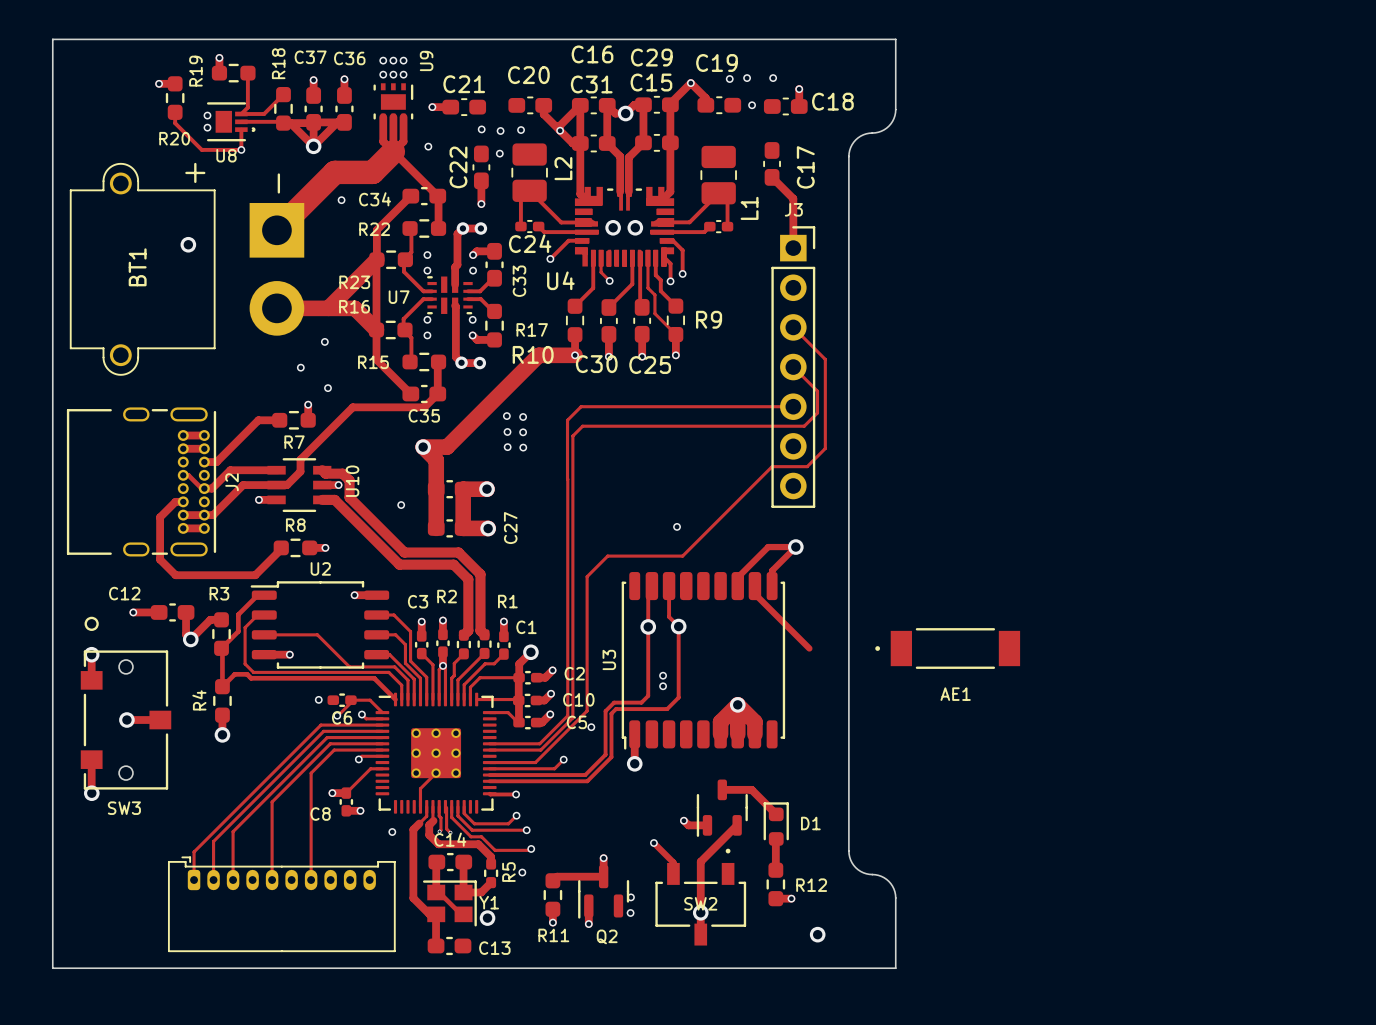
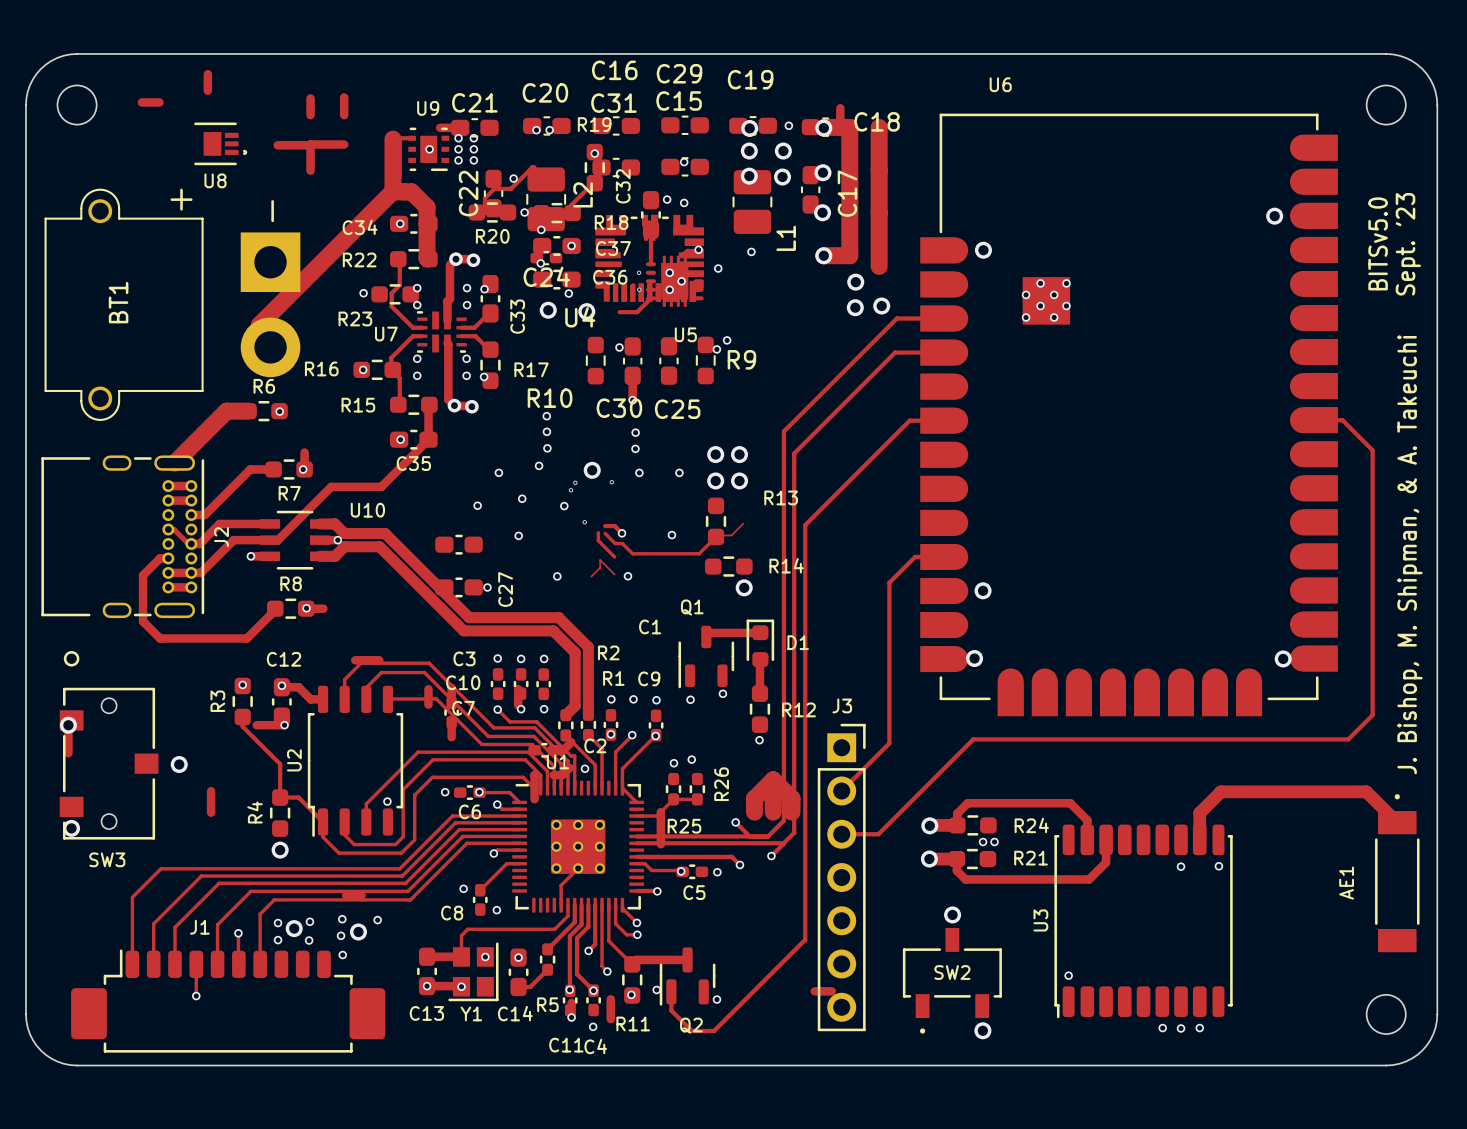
board edge: (99, 39) (52, 39) (52, 86) -> (77, 53) (57, 57) (40, 68) (29, 85) (25, 105)
board edge: (895, 39) (895, 109) (893, 118) (884, 129) (858, 137) (852, 144) (848, 156) (848, 851) (852, 862) (858, 869) (884, 877) (893, 889) (895, 897) (895, 968) (52, 968) (52, 919) -> (945, 53) (1386, 53) (1399, 55) (1417, 64) (1426, 73) (1433, 85) (1437, 105) (1437, 1014) (1433, 1033) (1422, 1050) (1405, 1061) (1386, 1065) (77, 1065) (57, 1061) (40, 1050) (29, 1033) (25, 1014)
via: (219, 57) -> none
via: (383, 60) -> none
via: (393, 60) -> none
via: (403, 60) -> none
U9 name position: U9 (426, 60) -> U9 (428, 108)
round board edge: none -> [56, 84, 98, 126]
round board edge: none -> [1365, 84, 1407, 126]
R19 rotation: 0° (233, 73) -> 90° clockwise (594, 167)
R19 position: (233, 73) -> (594, 167)
track: (247, 73) (247, 107) (241, 114) (264, 114) (283, 94) -> none
via: (383, 74) -> none
via: (393, 74) -> none
via: (403, 74) -> none
via: (747, 78) -> none
via: (773, 78) -> none
via: (344, 79) -> none
via: (729, 79) -> none
via: (313, 80) -> none
via: (159, 83) -> none
via: (690, 83) -> none
via: (799, 89) -> none
R20 rotation: 0° (175, 98) -> 90° clockwise (492, 212)
R20 position: (175, 98) -> (492, 212)
U9 rotation: 0° (393, 101) -> 90° clockwise (428, 149)
U9 position: (393, 101) -> (428, 149)
track: (543, 105) (543, 114) (572, 143) (580, 143) -> none
track: (705, 105) (705, 98) (690, 83) (670, 103) (670, 191) (660, 202) -> none
track: none -> (879, 127) (879, 266)
via: (432, 107) -> none
via: none -> (749, 128)
track: none -> (823, 128) (849, 127) (849, 255) (823, 255)
via: none -> (823, 128)
R18 rotation: 0° (283, 108) -> 90° clockwise (556, 213)
R18 position: (283, 108) -> (556, 213)
C37 rotation: 0° (313, 108) -> 90° clockwise (556, 245)
C37 position: (313, 108) -> (556, 245)
C36 rotation: 0° (344, 108) -> 90° clockwise (556, 279)
C36 position: (344, 108) -> (556, 279)
via: none -> (536, 130)
via: none -> (549, 130)
track: (175, 112) (175, 123) (201, 149) (241, 149) (241, 129) -> none
via: (625, 113) -> none
via: (207, 115) -> none
track: none -> (412, 138) (392, 139) (392, 191)
via: none -> (458, 138)
via: none -> (473, 138)
track: (383, 117) (383, 141) (438, 196) (438, 228) -> none
track: (403, 117) (403, 141) (372, 172) (334, 172) (276, 230) -> none
track: (241, 121) (283, 121) -> none
track: (337, 122) (313, 146) (290, 123) -> none
via: none -> (429, 149)
via: none -> (458, 149)
via: none -> (473, 149)
via: (207, 127) -> none
via: none -> (749, 151)
via: none -> (783, 151)
via: (481, 129) -> none
via: (500, 130) -> none
via: (521, 130) -> none
track: (560, 130) (560, 125) (580, 105) (580, 194) (588, 202) -> none
via position: (560, 130) -> (594, 153)
via: none -> (458, 160)
via: none -> (473, 160)
via: none -> (684, 162)
track: none -> (534, 167) (510, 188) (494, 188) (484, 198) (484, 213)
via: (313, 146) -> none
via: (428, 146) -> none
via: none -> (822, 172)
via: (241, 149) -> none
via: none -> (749, 176)
via: none -> (782, 176)
track: none -> (594, 181) (571, 205) (571, 213)
via: none -> (667, 199)
via: none -> (684, 202)
track: (772, 177) (793, 198) (793, 248) -> none
track: (481, 180) (481, 204) -> none
via: none -> (524, 212)
via: none -> (822, 212)
C32: none -> (650, 214)
via: none -> (1274, 216)
track: (620, 191) (620, 156) (607, 143) (607, 105) (615, 113) (625, 113) (634, 104) (643, 104) (643, 142) (628, 157) (628, 191) -> none
via: none -> (400, 223)
track: (410, 196) (376, 230) (376, 259) -> none
C34 position: (424, 196) -> (413, 223)
via: (341, 200) -> none
via: none -> (541, 229)
track: none -> (650, 229) (650, 264)
via: (481, 204) -> none
text: none -> BITSv5.0 (1378, 243)
text: none -> Sept. '23 (1408, 244)
via: none -> (571, 245)
via: none -> (698, 249)
via: none -> (983, 250)
via: none -> (751, 251)
track: (583, 222) (561, 222) (529, 190) (520, 199) (520, 226) -> none
track: (666, 222) (689, 222) (718, 193) (727, 202) (727, 226) -> none
via: none -> (823, 255)
track: (538, 226) (544, 232) (586, 232) -> none
track: (709, 226) (704, 232) (662, 232) -> none
part: (718, 226) -> none
track: none -> (427, 259) (427, 207) (411, 191) (392, 191) (259, 324) (259, 327)
via: (613, 227) -> none
via: (635, 227) -> none
track: (411, 228) (411, 252) (404, 259) (404, 271) (423, 291) (432, 291) -> (399, 259) (399, 285) (391, 293) (391, 306) (412, 327) (422, 327)
R22 position: (424, 228) -> (413, 259)
track: (480, 228) (462, 228) (457, 233) (455, 284) -> (475, 259) (455, 259) (450, 265) (450, 298) (447, 301) (447, 320)
via position: (480, 228) -> (455, 259)
via: none -> (540, 263)
via: none -> (718, 268)
via: none -> (639, 272)
via: none -> (669, 272)
track: (582, 240) (568, 240) (550, 259) -> none
track: (667, 240) (673, 240) (682, 250) (682, 273) -> none
via: (188, 244) -> none
U5: none -> (674, 281)
via: none -> (681, 281)
via: none -> (855, 282)
via: none -> (1040, 283)
via: none -> (1066, 283)
track: (494, 251) (476, 251) (473, 255) -> none
via: none -> (417, 288)
via: none -> (467, 288)
via: (427, 255) -> none
via: none -> (639, 289)
via: none -> (669, 289)
track: (663, 257) (670, 263) (670, 281) -> none
via: none -> (363, 293)
track: (593, 258) (593, 288) (575, 306) -> none
track: (601, 258) (601, 272) (609, 280) -> none
track: (632, 258) (632, 284) (608, 307) -> none
track: (647, 258) (647, 288) (654, 295) (654, 313) (675, 334) (675, 355) -> none
track: (655, 258) (655, 275) (660, 280) (660, 291) (675, 306) -> none
track: (376, 259) (328, 308) (276, 308) (354, 308) (376, 329) -> none
track: (376, 259) (376, 359) (410, 393) -> none
track: (640, 259) (640, 305) (642, 307) -> none
via: none -> (1026, 294)
via: none -> (1054, 294)
track: none -> (650, 298) (637, 312) (619, 312)
C33 position: (494, 264) -> (490, 298)
via: none -> (417, 305)
via: none -> (467, 305)
via: (427, 270) -> none
via: (473, 270) -> none
via: none -> (881, 305)
via: none -> (1040, 305)
via: none -> (1066, 305)
via: none -> (855, 307)
via: (682, 273) -> none
via: none -> (548, 310)
via: none -> (586, 311)
track: (494, 276) (480, 291) (468, 291) -> (490, 311) (474, 327) (461, 327)
via: (609, 280) -> none
via: none -> (1026, 317)
via: none -> (1054, 317)
via: (670, 281) -> none
track: none -> (937, 318) (896, 318) (783, 431) (783, 820) (768, 836) (636, 836)
U7 position: (449, 295) -> (441, 331)
track: (432, 299) (423, 299) (403, 319) (403, 329) (411, 337) (411, 361) -> (422, 336) (412, 336) (391, 357) (391, 369) (399, 378) (399, 404)
track: (468, 299) (480, 299) (494, 312) -> (461, 336) (475, 336) (490, 351)
via: none -> (727, 340)
track: (455, 305) (455, 357) (461, 363) (479, 363) -> (447, 343) (448, 399) (454, 405) (474, 405)
R16 name position: R16 (354, 306) -> R16 (321, 368)
via: none -> (619, 347)
via: none -> (716, 349)
track: none -> (937, 352) (895, 352) (794, 453) (794, 832) (783, 843)
via: none -> (417, 358)
via: none -> (466, 358)
via: (427, 319) -> none
via: (472, 319) -> none
R17 position: (494, 325) -> (490, 365)
track: (793, 327) (825, 359) (825, 448) (807, 466) (772, 466) (682, 556) (607, 556) (587, 576) (587, 710) (535, 762) (489, 762) -> none
via: none -> (363, 369)
R16 position: (390, 329) -> (377, 369)
via: none -> (417, 375)
via: none -> (466, 375)
track: (575, 334) (575, 355) (538, 355) (447, 447) (423, 447) (436, 460) (436, 528) -> none
track: (642, 334) (642, 356) -> none
via: (427, 335) -> none
track: (472, 335) (477, 339) (494, 339) -> none
via: (324, 341) -> none
via: (575, 355) -> none
via: (675, 355) -> none
via: (642, 356) -> none
R15 position: (424, 361) -> (413, 404)
track: (438, 361) (437, 393) (424, 407) (352, 407) (300, 459) (300, 471) (287, 485) (283, 485) -> (429, 404) (428, 439) (381, 486) (331, 486) (278, 540)
via position: (479, 363) -> (454, 405)
track: none -> (248, 411) (226, 411) (174, 463)
R6: none -> (263, 411)
via position: (300, 367) -> (279, 411)
track: (793, 367) (817, 391) (817, 412) (804, 426) (582, 426) (572, 436) (572, 717) (540, 750) (489, 750) -> none
J3 position: (793, 367) -> (841, 877)
U6: none -> (1129, 414)
via: none -> (546, 416)
track: none -> (937, 420) (909, 420) (805, 525) (805, 939) (713, 1031) (691, 1031) (671, 1010) (671, 991)
track: none -> (1320, 420) (1342, 420) (1372, 450) (1372, 715) (1348, 739) (973, 739) (878, 834) (841, 834)
via: none -> (546, 431)
via: none -> (635, 432)
via: (327, 388) -> none
via: none -> (400, 439)
C35 position: (424, 393) -> (413, 439)
via: none -> (547, 448)
via: none -> (635, 448)
via position: (308, 404) -> (303, 469)
via: none -> (715, 454)
via: none -> (739, 454)
track: (793, 406) (581, 406) (567, 420) (567, 715) (539, 743) (489, 743) -> none
via: (506, 416) -> none
via: none -> (592, 470)
via: none -> (498, 472)
via: none -> (639, 472)
via: none -> (679, 472)
via: none -> (715, 480)
via: none -> (739, 480)
via: (507, 431) -> none
via: none -> (611, 482)
via: (523, 432) -> none
via: none -> (575, 482)
via: none -> (570, 490)
via: (423, 447) -> none
via: (523, 447) -> none
via: none -> (477, 505)
via: none -> (564, 506)
R13: none -> (716, 521)
via: none -> (584, 522)
track: none -> (743, 523) (731, 535) (716, 535)
track: (322, 470) (325, 473) (342, 473) (349, 480) (349, 497) (404, 552) (458, 552) (480, 574) (480, 630) (484, 634) -> (319, 523) (334, 523) (344, 533) (385, 533) (469, 617) (558, 617) (588, 647) (588, 714)
track: none -> (605, 526) (614, 526) (622, 533)
track: none -> (598, 532) (598, 540) (614, 557)
track: none -> (605, 533) (615, 543) (622, 543) (632, 553) (699, 553) (716, 536)
via: none -> (622, 533)
via: none -> (671, 535)
U10 name rotation: 0° (352, 481) -> 90° clockwise (367, 510)
via: none -> (518, 535)
track: (486, 489) (463, 489) (463, 528) (487, 528) -> none
via: (486, 489) -> none
text: none -> J. Bishop, M. Shipman, & A. Takeuchi (1409, 554)
track: (334, 499) (399, 564) (453, 564) (468, 579) (468, 630) (463, 635) -> (333, 556) (344, 546) (379, 546) (463, 630) (553, 630) (575, 652) (575, 705) (565, 715)
track: none -> (937, 556) (915, 556) (889, 582) (889, 743) (841, 791)
via: (401, 505) -> none
R14: none -> (728, 566)
track: none -> (614, 574) (600, 560) (600, 567) (591, 576)
via: none -> (557, 576)
via: none -> (627, 576)
via: (677, 526) -> none
via: none -> (487, 587)
via: (488, 528) -> none
C27 name position: C27 (510, 528) -> C27 (505, 589)
via: none -> (744, 587)
via: none -> (983, 590)
via position: (325, 547) -> (306, 608)
via: (795, 547) -> none
track: none -> (760, 632) (710, 632) (706, 636)
track: (651, 586) (648, 589) (648, 695) (641, 702) (614, 702) (605, 711) (605, 754) (585, 775) (489, 775) -> none
track: (669, 586) (669, 616) (678, 626) (678, 697) (667, 709) (616, 709) (611, 713) (611, 757) (587, 781) (489, 781) -> none
track: (737, 586) (737, 577) (768, 547) (795, 547) (772, 570) (772, 586) -> none
track: (754, 586) (754, 594) (809, 648) -> none
Q1: none -> (706, 656)
R3 name rotation: 0° (219, 593) -> 90° counterclockwise (217, 701)
R3 name position: R3 (219, 593) -> R3 (217, 701)
via: none -> (497, 658)
via: none -> (521, 658)
via: none -> (544, 658)
via: none -> (974, 658)
via: none -> (1283, 658)
track: (264, 595) (257, 595) (238, 614) (238, 631) (221, 648) (222, 686) (234, 674) (247, 674) (251, 678) (374, 678) (395, 699) -> none
via: (354, 595) -> none
R2 name position: R2 (447, 596) -> R2 (608, 652)
C3 name position: C3 (418, 601) -> C3 (464, 658)
track: (133, 612) (159, 612) -> none
via: (133, 612) -> none
C12 rotation: 0° (172, 612) -> 90° clockwise (281, 701)
C12 position: (172, 612) -> (281, 701)
track: (186, 612) (186, 634) (190, 639) (210, 619) (221, 619) -> none
track: (264, 615) (257, 615) (245, 627) (245, 663) (253, 672) (388, 672) (401, 685) (401, 699) -> none
track: (376, 615) (393, 615) (410, 631) (410, 661) (426, 677) (426, 699) -> none
via: none -> (242, 684)
C7: none -> (543, 684)
via: none -> (281, 685)
track: none -> (281, 687) (298, 687) (310, 699) (323, 699)
via: (442, 620) -> none
via: (421, 621) -> none
via: (503, 621) -> none
U2 rotation: 0° (319, 624) -> 90° counterclockwise (355, 761)
via: none -> (722, 693)
via: (648, 626) -> none
via: (678, 626) -> none
C1 name position: C1 (526, 627) -> C1 (650, 626)
track: none -> (344, 699) (344, 679) (361, 663) (429, 663) (493, 727) (534, 727) (567, 761) (567, 788)
track: none -> (366, 699) (366, 687) (381, 672) (424, 672) (488, 736) (533, 736) (561, 763) (561, 788)
track: none -> (387, 699) (436, 698) (481, 744) (532, 744) (554, 766) (554, 788)
via: none -> (611, 699)
via: none -> (633, 699)
via: none -> (656, 700)
via: none -> (690, 699)
R3 position: (221, 634) -> (242, 701)
track: (264, 634) (317, 634) (349, 666) (394, 666) (407, 680) (407, 699) -> none
track: (376, 634) (395, 634) (405, 644) (405, 663) (420, 678) (420, 699) -> none
via: (190, 639) -> none
track: none -> (497, 709) (509, 721) (536, 721) (570, 756) (574, 756) (574, 788)
via: none -> (497, 709)
via: none -> (521, 709)
via: none -> (544, 709)
C3 position: (421, 644) -> (498, 684)
R2 position: (463, 644) -> (565, 725)
R1 position: (484, 644) -> (588, 724)
C1 position: (503, 645) -> (610, 724)
track: none -> (242, 717) (242, 726) (280, 764) (280, 797) (298, 797) (323, 821) (323, 837) (338, 853) (401, 853) (414, 839) (414, 795) (432, 777) (523, 777) (533, 788)
AE1 rotation: 0° (947, 648) -> 90° clockwise (1397, 873)
AE1 position: (947, 648) -> (1397, 873)
track: (530, 652) (519, 663) (518, 700) (476, 699) -> none
via: (530, 652) -> none
track: (421, 653) (432, 664) (432, 699) -> none
track: (463, 653) (454, 663) (454, 675) (451, 678) (451, 699) -> none
track: (484, 653) (457, 680) (457, 699) -> none
track: (504, 653) (494, 663) (485, 663) (464, 684) (464, 699) -> none
track: (376, 654) (389, 654) (414, 679) (414, 699) -> none
C9: none -> (656, 725)
U3 position: (703, 660) -> (1143, 921)
track: none -> (588, 735) (602, 748) (602, 788)
via: none -> (610, 734)
via: none -> (632, 735)
track: none -> (633, 734) (615, 752) (615, 788)
track: none -> (656, 735) (622, 768) (622, 788) (636, 802)
track: none -> (565, 735) (595, 764) (595, 788)
via: none -> (655, 735)
via: (443, 665) -> none
via: none -> (759, 740)
via: (552, 670) -> none
via: (663, 675) -> none
track: (519, 677) (480, 677) (470, 687) (470, 699) -> none
via: none -> (673, 763)
via: none -> (179, 764)
via: (551, 693) -> none
via: none -> (584, 768)
via: (318, 699) -> none
track: (439, 699) (439, 669) (443, 665) (445, 668) (445, 699) -> none
C10 name position: C10 (578, 699) -> C10 (463, 682)
R4 position: (222, 700) -> (280, 813)
C6 position: (342, 700) -> (469, 792)
C10 rotation: 0° (527, 700) -> 90° clockwise (521, 684)
C10 position: (527, 700) -> (521, 684)
SW3 position: (126, 703) -> (109, 745)
via: (737, 704) -> none
track: (382, 712) (370, 700) (350, 700) (350, 702) (337, 715) -> none
track: (489, 712) (508, 712) (517, 722) -> none
track: none -> (540, 788) (540, 775) (525, 759) (432, 759) (403, 789) (403, 836) (395, 844) (354, 844) (344, 835) (344, 821)
track: none -> (547, 788) (547, 771) (528, 752) (418, 752) (366, 803) (366, 821)
R25: none -> (673, 789)
R26: none -> (697, 789)
track: (361, 714) (366, 718) (382, 718) -> (497, 804) (501, 809) (519, 809)
via: (361, 714) -> none
track: (550, 714) (542, 722) (536, 722) -> none
via: (550, 714) -> none
via: (337, 715) -> none
via: none -> (445, 792)
track: none -> (479, 792) (509, 792) (519, 802)
via: none -> (479, 792)
track: (126, 720) (160, 720) -> none
via: (126, 720) -> none
C5 position: (527, 722) -> (692, 871)
C5 name position: C5 (576, 722) -> C5 (694, 892)
track: none -> (697, 799) (673, 799) (656, 816) (636, 816)
via: none -> (387, 801)
track: (382, 725) (320, 725) (194, 851) (194, 880) -> none
via: none -> (497, 804)
via: (591, 727) -> none
track: (382, 731) (323, 731) (213, 841) (213, 880) -> none
via: (222, 734) -> none
track: (382, 737) (327, 737) (233, 831) (233, 880) -> none
track: none -> (519, 816) (452, 816) (399, 868) (160, 868) (132, 897) (132, 964)
track: (382, 743) (330, 743) (272, 802) (272, 880) -> none
track: none -> (735, 822) (749, 836)
via: none -> (735, 822)
track: none -> (519, 822) (455, 822) (402, 876) (201, 876) (153, 923) (153, 964)
track: none -> (1397, 822) (1366, 791) (1220, 791) (1199, 813) (1199, 839)
track: none -> (930, 825) (957, 825) (957, 813) (967, 803) (1070, 803) (1087, 820) (1087, 839)
via: none -> (929, 825)
R24: none -> (972, 825)
via: none -> (71, 828)
track: (382, 750) (334, 750) (311, 773) (311, 880) -> none
track: none -> (519, 829) (459, 829) (405, 883) (219, 883) (174, 927) (174, 964)
part: (436, 753) -> none
track: (382, 756) (361, 756) (358, 759) -> (519, 850) (497, 850) (493, 853)
track: none -> (519, 836) (462, 836) (407, 891) (250, 891) (217, 924) (217, 964)
track: (91, 759) (91, 793) -> none
via: (358, 759) -> none
track: (563, 759) (554, 768) (489, 768) -> none
via: (563, 759) -> none
track: none -> (1106, 839) (1106, 862) (1089, 879) (965, 879) (956, 870) (956, 859) (929, 859)
via: none -> (983, 842)
via: none -> (994, 842)
track: none -> (519, 843) (467, 843) (410, 899) (274, 899) (260, 914) (260, 964)
track: none -> (636, 843) (783, 843)
track: none -> (783, 843) (771, 856)
via: (634, 763) -> none
U1: none -> (578, 846)
track: (382, 768) (370, 768) (346, 793) (332, 793) -> none
via: none -> (280, 850)
via: none -> (493, 853)
track: (436, 773) (420, 788) (420, 806) -> (578, 868) (561, 885) (561, 905)
via: none -> (771, 856)
track: none -> (636, 856) (731, 856) (739, 864)
via: none -> (929, 859)
R21: none -> (972, 859)
track: none -> (519, 863) (506, 863) (480, 890)
track: none -> (636, 863) (645, 863) (651, 870) (682, 871)
via: none -> (739, 864)
via: none -> (1181, 866)
via: none -> (1218, 866)
via: none -> (681, 871)
via: none -> (717, 872)
track: (722, 789) (751, 789) (776, 814) -> none
via: (91, 793) -> none
via: (332, 793) -> none
track: (489, 793) (516, 794) -> none
via: (516, 794) -> none
C8 position: (346, 801) -> (480, 899)
via: none -> (463, 888)
track: (426, 806) (426, 816) (413, 829) (413, 898) (429, 914) (436, 914) -> none
track: (432, 806) (433, 820) (429, 825) (429, 835) (438, 844) (478, 844) (491, 856) (491, 863) -> none
track: (439, 806) (440, 817) (439, 831) -> none
track: (445, 806) (446, 828) (450, 832) -> none
track: (451, 806) (451, 817) (471, 836) (481, 836) (495, 850) (531, 848) -> none
track: (457, 806) (457, 815) (472, 830) (526, 830) -> none
track: (464, 806) (464, 813) (474, 823) (508, 823) (516, 815) -> none
track: none -> (636, 890) (657, 891)
via: none -> (657, 891)
part: (722, 808) -> none
via: (360, 810) -> none
via: (516, 815) -> none
track: none -> (567, 905) (567, 916) (554, 929) (467, 929) (461, 935) (461, 956)
track: none -> (574, 905) (574, 922) (547, 949)
track: none -> (581, 905) (581, 924) (569, 936) (570, 990)
track: none -> (588, 905) (588, 926) (577, 938) (577, 974) (593, 990)
track: none -> (595, 905) (595, 944) (588, 950)
track: none -> (602, 905) (602, 966) (607, 971)
track: none -> (608, 905) (608, 940) (632, 964) (636, 959) (687, 959)
track: none -> (615, 905) (615, 923) (626, 934) (637, 934)
track: none -> (622, 905) (622, 908) (636, 922)
track: (683, 820) (688, 825) (707, 825) -> none
via: (683, 820) -> none
via: none -> (496, 910)
D1 position: (776, 824) -> (760, 643)
track: (737, 825) (700, 861) (700, 934) -> none
via: none -> (952, 914)
via: (526, 830) -> none
via: (439, 831) -> none
via: none -> (342, 919)
via: (392, 832) -> none
via: (450, 832) -> none
via: none -> (377, 920)
via: none -> (309, 921)
via: none -> (636, 922)
via: none -> (278, 923)
track: (776, 838) (775, 870) -> (760, 659) (759, 693)
C14 name position: C14 (450, 839) -> C14 (515, 1013)
via: none -> (294, 928)
track: (653, 843) (673, 862) (673, 873) -> none
via: (653, 843) -> none
via: none -> (358, 932)
track: none -> (238, 933) (238, 964)
via: none -> (238, 933)
via: none -> (637, 934)
via: none -> (341, 935)
via: (531, 848) -> none
via: none -> (278, 940)
via: none -> (309, 940)
track: (603, 858) (603, 876) (557, 876) (552, 880) -> none
via: (603, 858) -> none
via: none -> (588, 950)
track: (436, 862) (436, 892) (440, 892) (462, 914) -> none
C14 rotation: 0° (450, 862) -> 90° clockwise (518, 972)
C14 position: (450, 862) -> (518, 972)
track: (463, 862) (463, 892) (481, 892) (491, 882) -> none
via: none -> (342, 954)
track: none -> (427, 956) (461, 956)
via: none -> (485, 956)
via: none -> (518, 957)
R5 name rotation: 0° (508, 872) -> 90° clockwise (547, 1004)
R5 name position: R5 (508, 872) -> R5 (547, 1004)
via: (522, 872) -> none
track: none -> (196, 964) (196, 996)
R5 position: (491, 873) -> (547, 959)
track: none -> (547, 969) (530, 986) (518, 986)
via: none -> (607, 971)
R12 position: (775, 884) -> (759, 709)
via: none -> (1068, 975)
Q2 position: (603, 891) -> (687, 976)
track: none -> (427, 986) (461, 986)
via: none -> (427, 986)
via: none -> (461, 986)
R11 position: (552, 895) -> (632, 979)
via: none -> (569, 989)
SW2 rotation: 0° (700, 897) -> 180° (952, 980)
SW2 position: (700, 897) -> (952, 980)
via: none -> (593, 990)
via: (791, 898) -> none
via: none -> (631, 994)
round board edge: none -> [1365, 993, 1407, 1035]
via: none -> (196, 996)
Y1 rotation: 0° (449, 903) -> 90° clockwise (473, 971)
part: (281, 904) -> none
C4: none -> (593, 1000)
via: none -> (716, 999)
J1: none -> (228, 1001)
C11: none -> (570, 1000)
via: (630, 912) -> none
via: (700, 912) -> none
track: (433, 914) (436, 914) (436, 945) -> none
via: (487, 918) -> none
via: (588, 924) -> none
via: none -> (593, 1026)
via: none -> (1162, 1028)
via: none -> (1181, 1028)
via: none -> (1199, 1028)
via: (817, 934) -> none
via: none -> (982, 1030)
C13 rotation: 0° (449, 945) -> 90° clockwise (427, 971)
C13 position: (449, 945) -> (427, 971)

